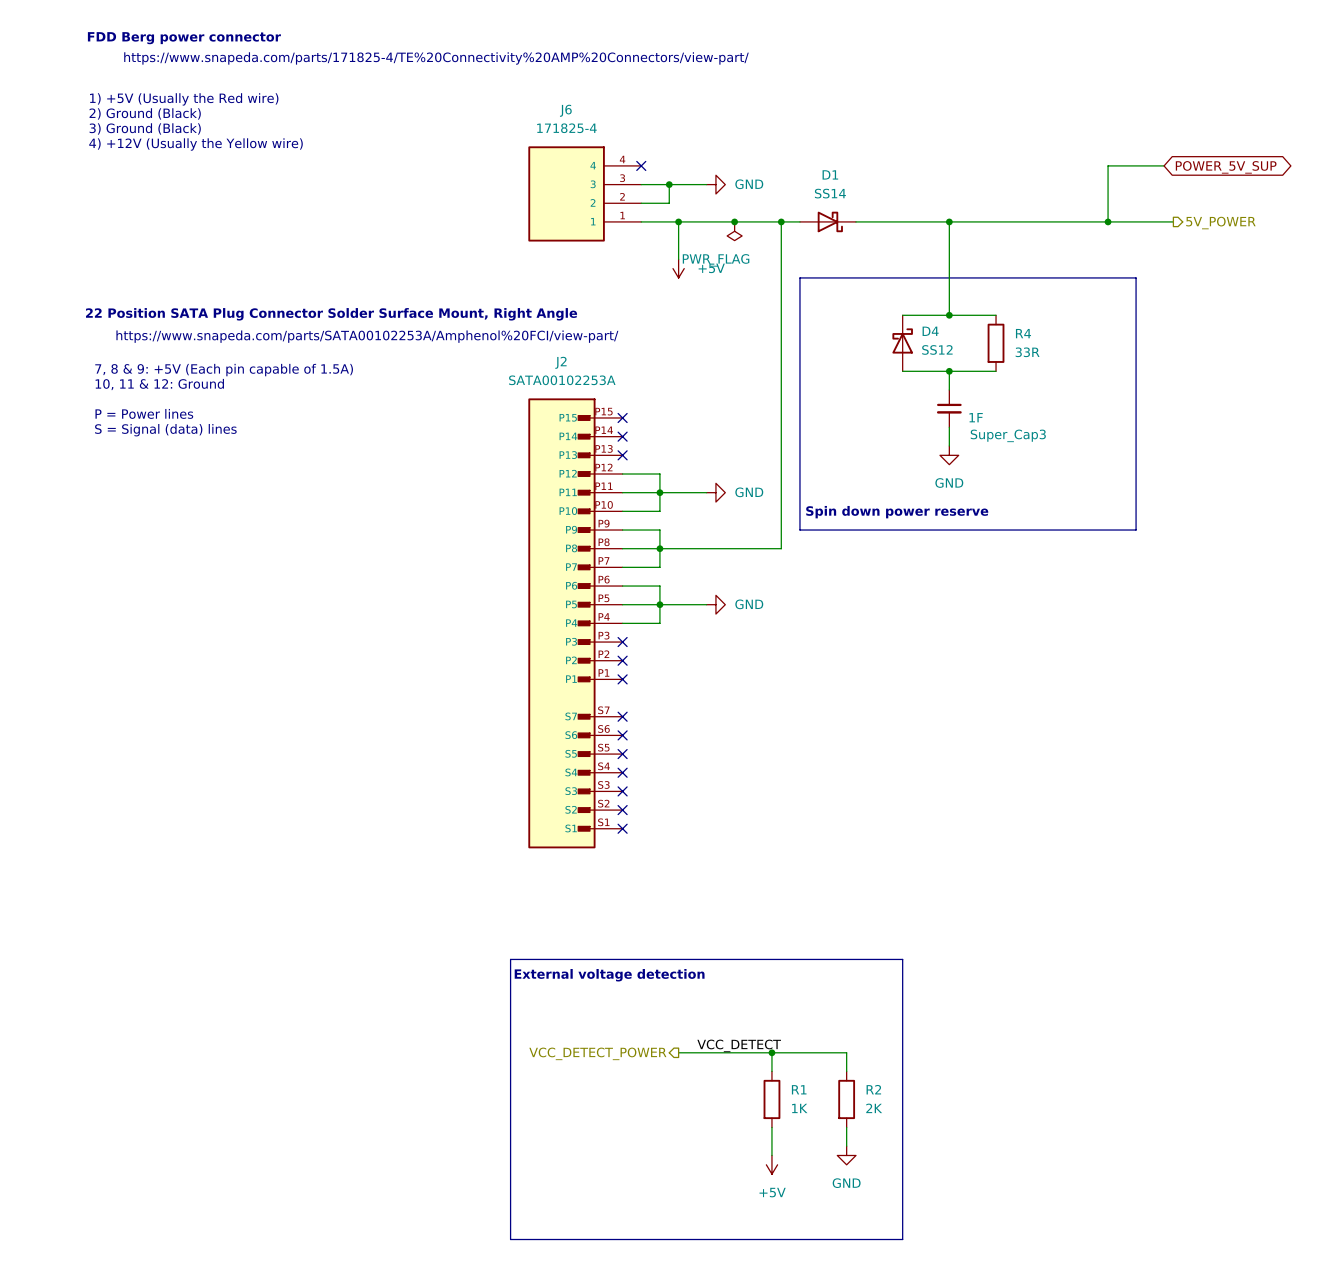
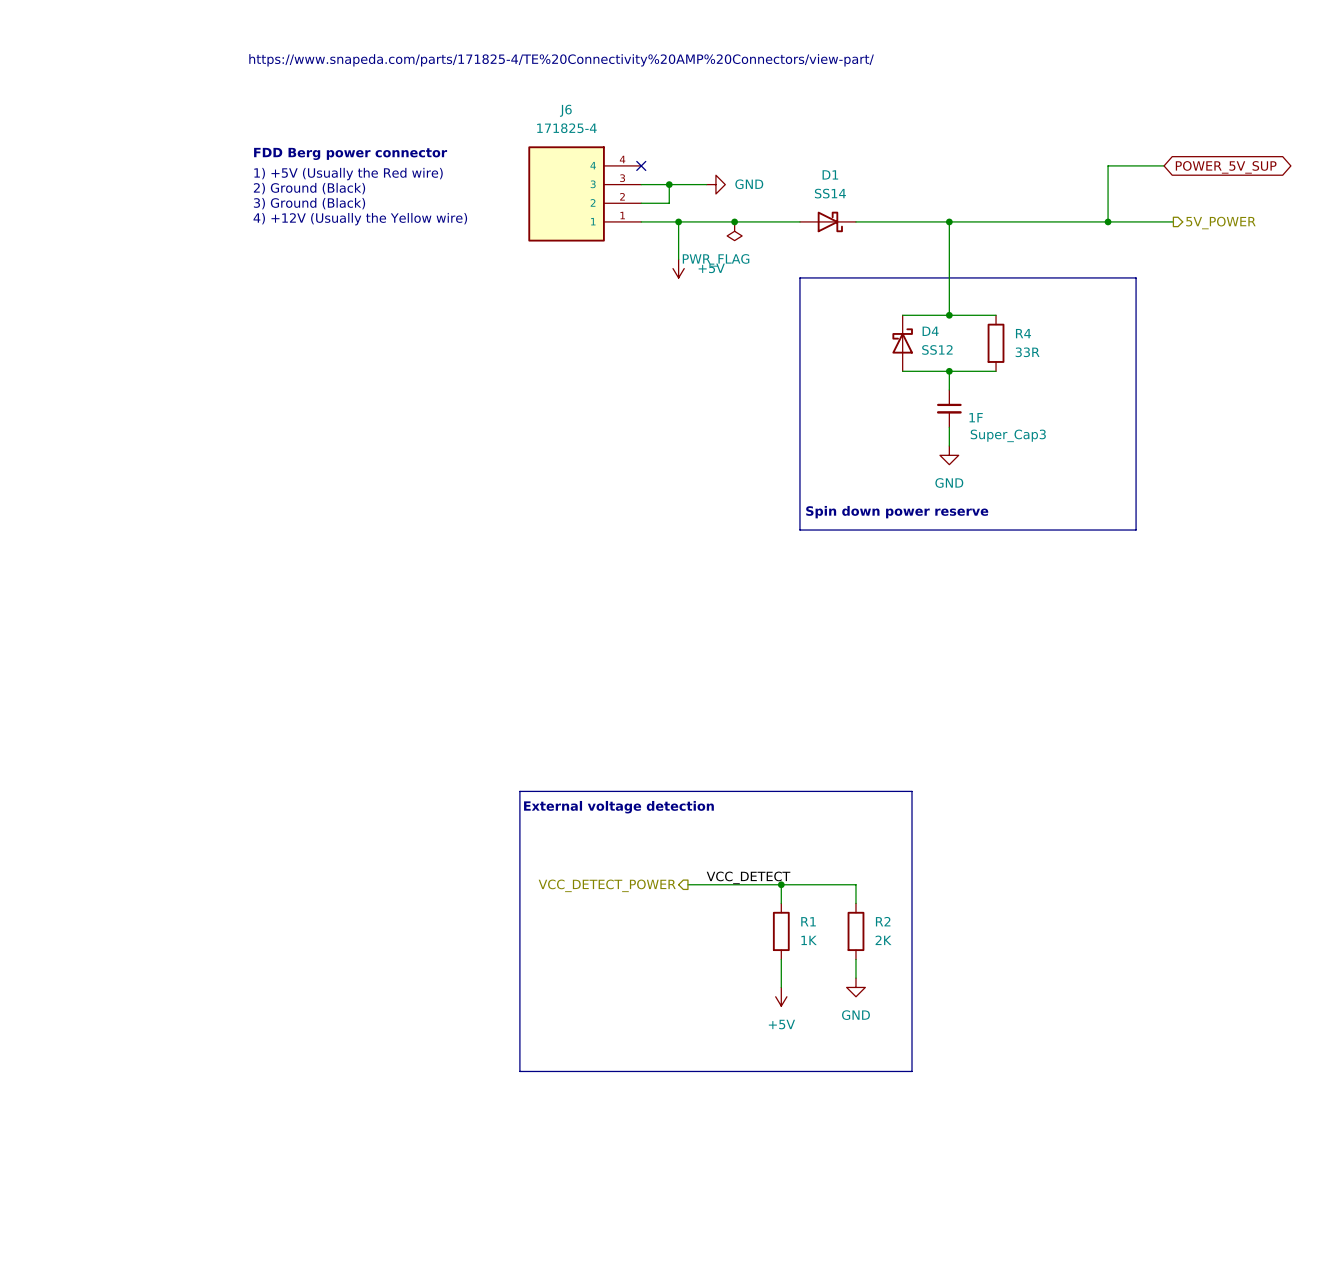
text: FDD Berg power connector (184, 38) -> none
text position: https://www.snapeda.com/parts/171825-4/TE%20Connectivity%20AMP%20Connectors/view-part/ (436, 58) -> https://www.snapeda.com/parts/171825-4/TE%20Connectivity%20AMP%20Connectors/view-part/ (561, 60)
text position: 1) +5V (Usually the Red wire) (184, 99) -> 1) +5V (Usually the Red wire) (348, 174)
text position: 2) Ground (Black) (145, 113) -> 2) Ground (Black) (309, 188)
text position: 3) Ground (Black) (145, 128) -> 3) Ground (Black) (309, 203)
text position: 4) +12V (Usually the Yellow wire) (196, 144) -> 4) +12V (Usually the Yellow wire) (360, 219)
text: none -> FDD Berg power connector (350, 153)
wire: (781, 221) (781, 548) (622, 548) -> none
junction: (781, 221) -> none
text: 22 Position SATA Plug Connector Solder Surface Mount, Right Angle (331, 314) -> none
text: https://www.snapeda.com/parts/SATA00102253A/Amphenol%20FCI/view-part/ (367, 336) -> none
text: 7, 8 & 9: +5V (Each pin capable of 1.5A) (224, 370) -> none
text: 10, 11 & 12: Ground (159, 384) -> none
text: P = Power lines (144, 413) -> none
no-connect mark: (622, 417) -> none
text: S = Signal (data) lines (165, 430) -> none
no-connect mark: (622, 436) -> none
no-connect mark: (622, 455) -> none
wire: (622, 474) (659, 474) (659, 511) (622, 511) -> none
wire: (622, 492) (706, 492) -> none
junction: (659, 492) -> none
power symbol: GND (715, 492) -> none
wire: (622, 530) (659, 530) (659, 567) (622, 567) -> none
junction: (659, 548) -> none
wire: (622, 586) (659, 586) (659, 623) (622, 623) -> none
wire: (622, 604) (706, 604) -> none
junction: (659, 604) -> none
power symbol: GND (715, 604) -> none
J2: SATA00102253A (575, 623) -> none
no-connect mark: (622, 642) -> none
no-connect mark: (622, 660) -> none
no-connect mark: (622, 679) -> none
no-connect mark: (622, 716) -> none
no-connect mark: (622, 735) -> none
no-connect mark: (622, 754) -> none
no-connect mark: (622, 772) -> none
no-connect mark: (622, 791) -> none
no-connect mark: (622, 810) -> none
no-connect mark: (622, 828) -> none
junction: none -> (781, 884)
line: (510, 959) (902, 959) (902, 1239) (510, 1239) (510, 959) -> (519, 791) (912, 791) (912, 1071) (519, 1071) (519, 791)
text position: External voltage detection (609, 975) -> External voltage detection (618, 807)
label position: VCC_DETECT (739, 1045) -> VCC_DETECT (748, 877)
wire: (678, 1052) (846, 1052) (846, 1071) -> (687, 884) (855, 884) (855, 903)
wire: (771, 1052) (771, 1071) -> (781, 884) (781, 903)
junction: (771, 1052) -> none
hierarchical label position: VCC_DETECT_POWER (597, 1053) -> VCC_DETECT_POWER (607, 885)
R1 position: (771, 1099) -> (781, 931)
R2 position: (846, 1099) -> (855, 931)
wire: (771, 1127) (771, 1155) -> (781, 959) (781, 987)
wire: (846, 1127) (846, 1146) -> (855, 959) (855, 978)
power symbol position: GND (846, 1155) -> GND (855, 987)
power symbol position: +5V (771, 1164) -> +5V (781, 996)

